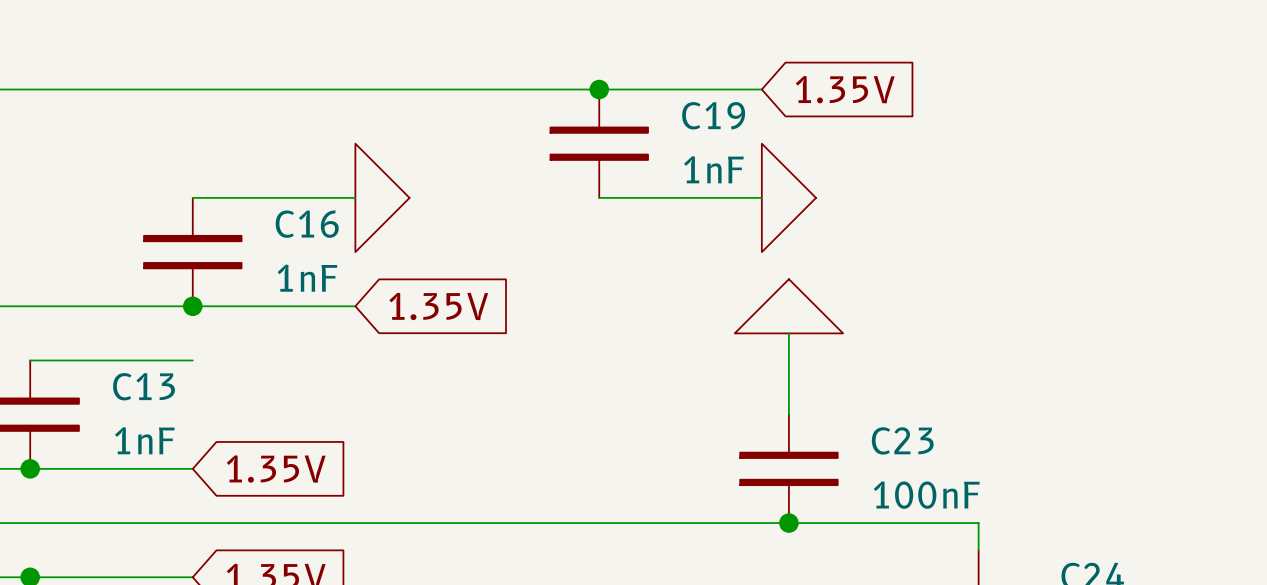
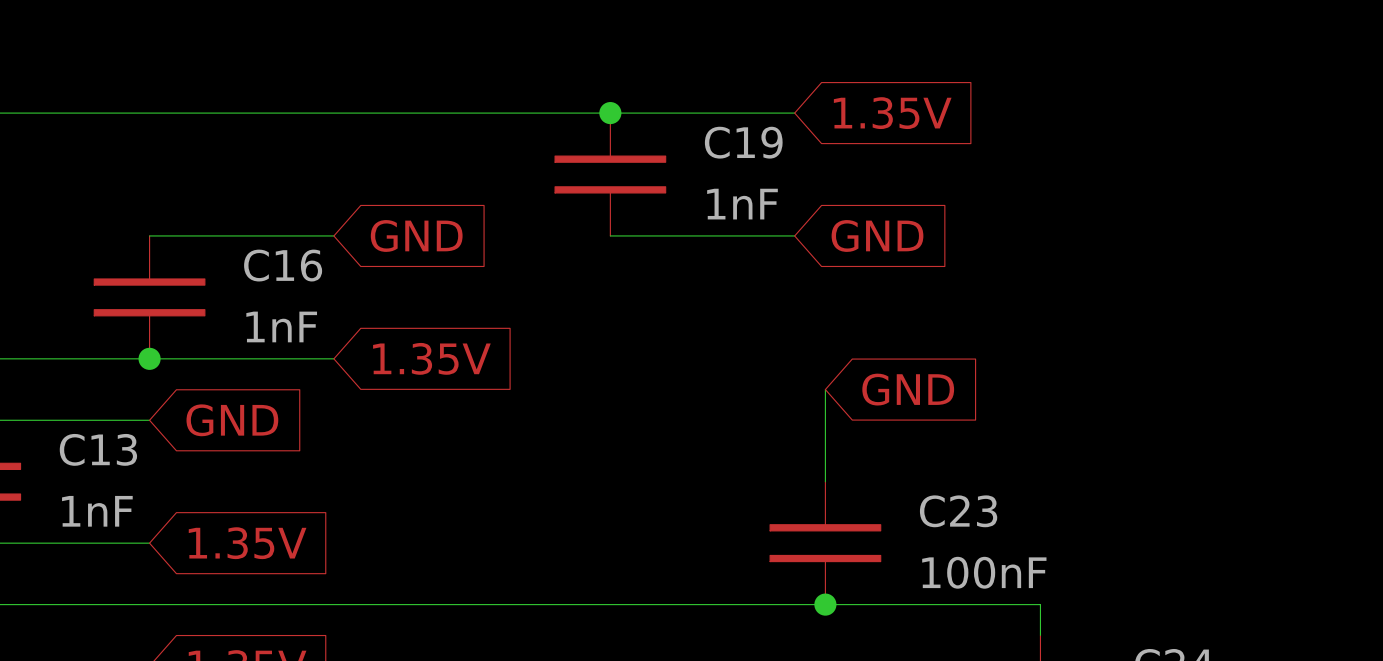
power symbol: (382, 197) -> none
power symbol: (788, 197) -> none
global label: none -> GND (416, 235)
global label: none -> GND (877, 235)
power symbol: (788, 306) -> none
global label: none -> GND (908, 389)
global label: none -> GND (232, 420)

